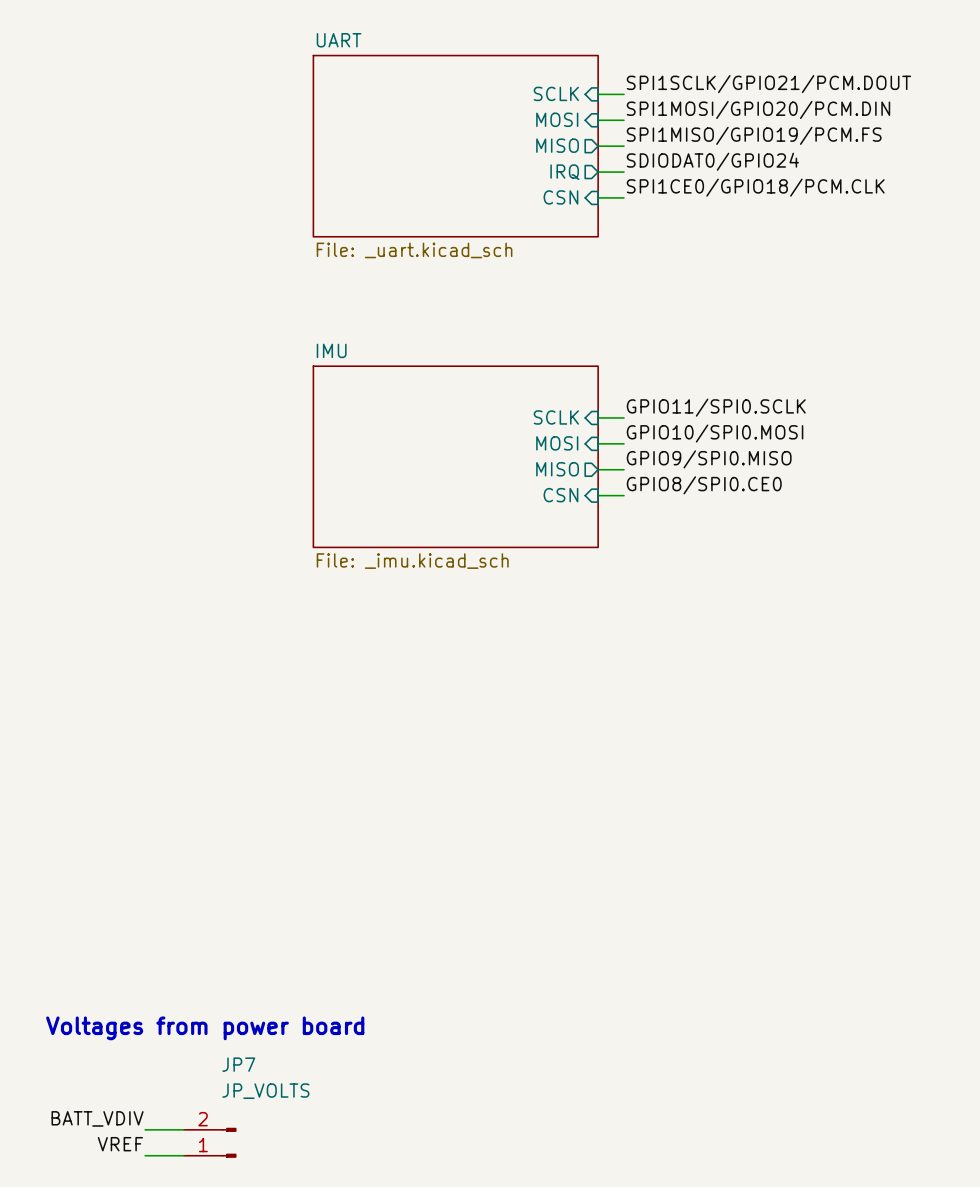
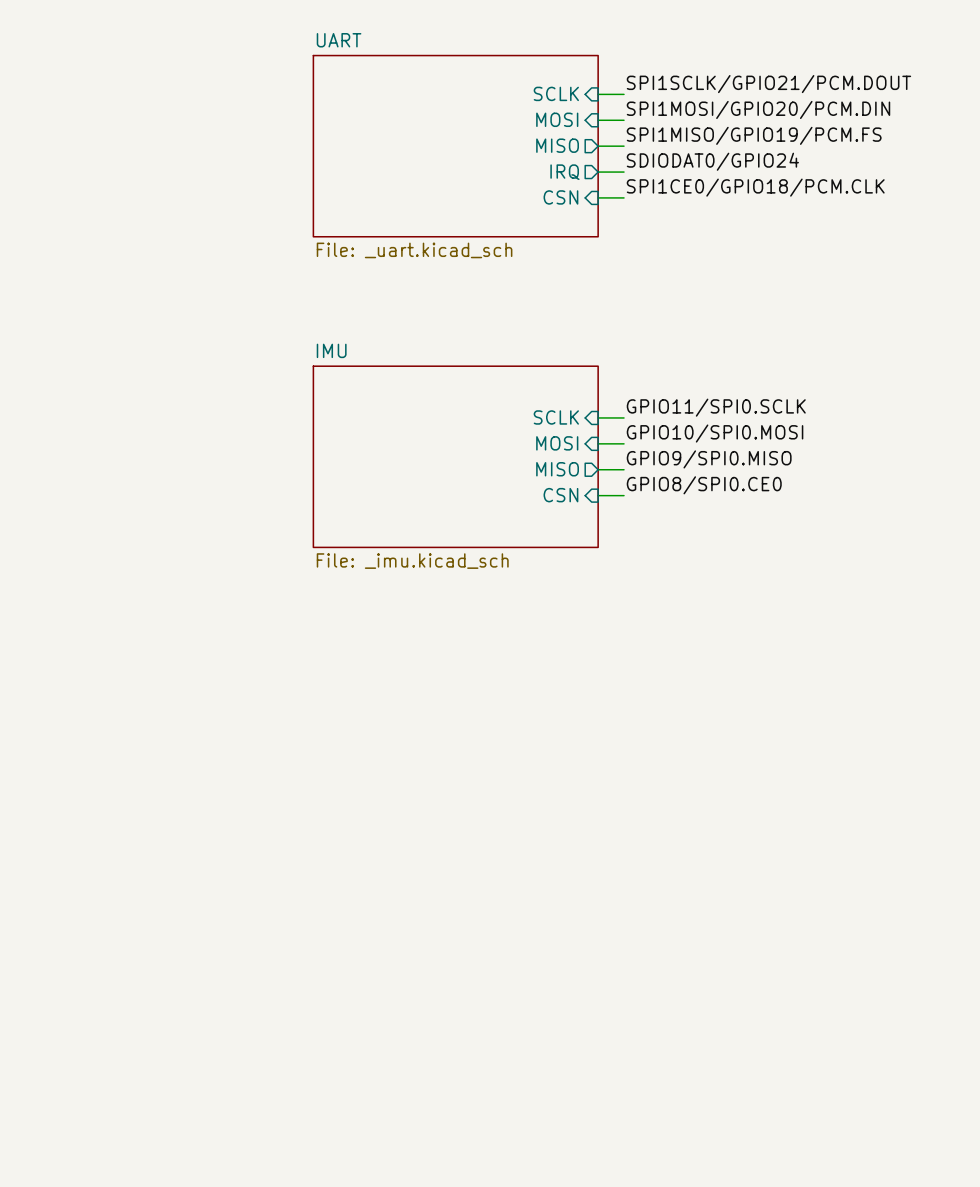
text: Voltages from power board (205, 1028) -> none
label: BATT_VDIV (97, 1118) -> none
wire: (145, 1129) (183, 1129) -> none
JP7: JP_VOLTS (210, 1142) -> none
label: VREF (120, 1144) -> none
wire: (145, 1155) (183, 1155) -> none

